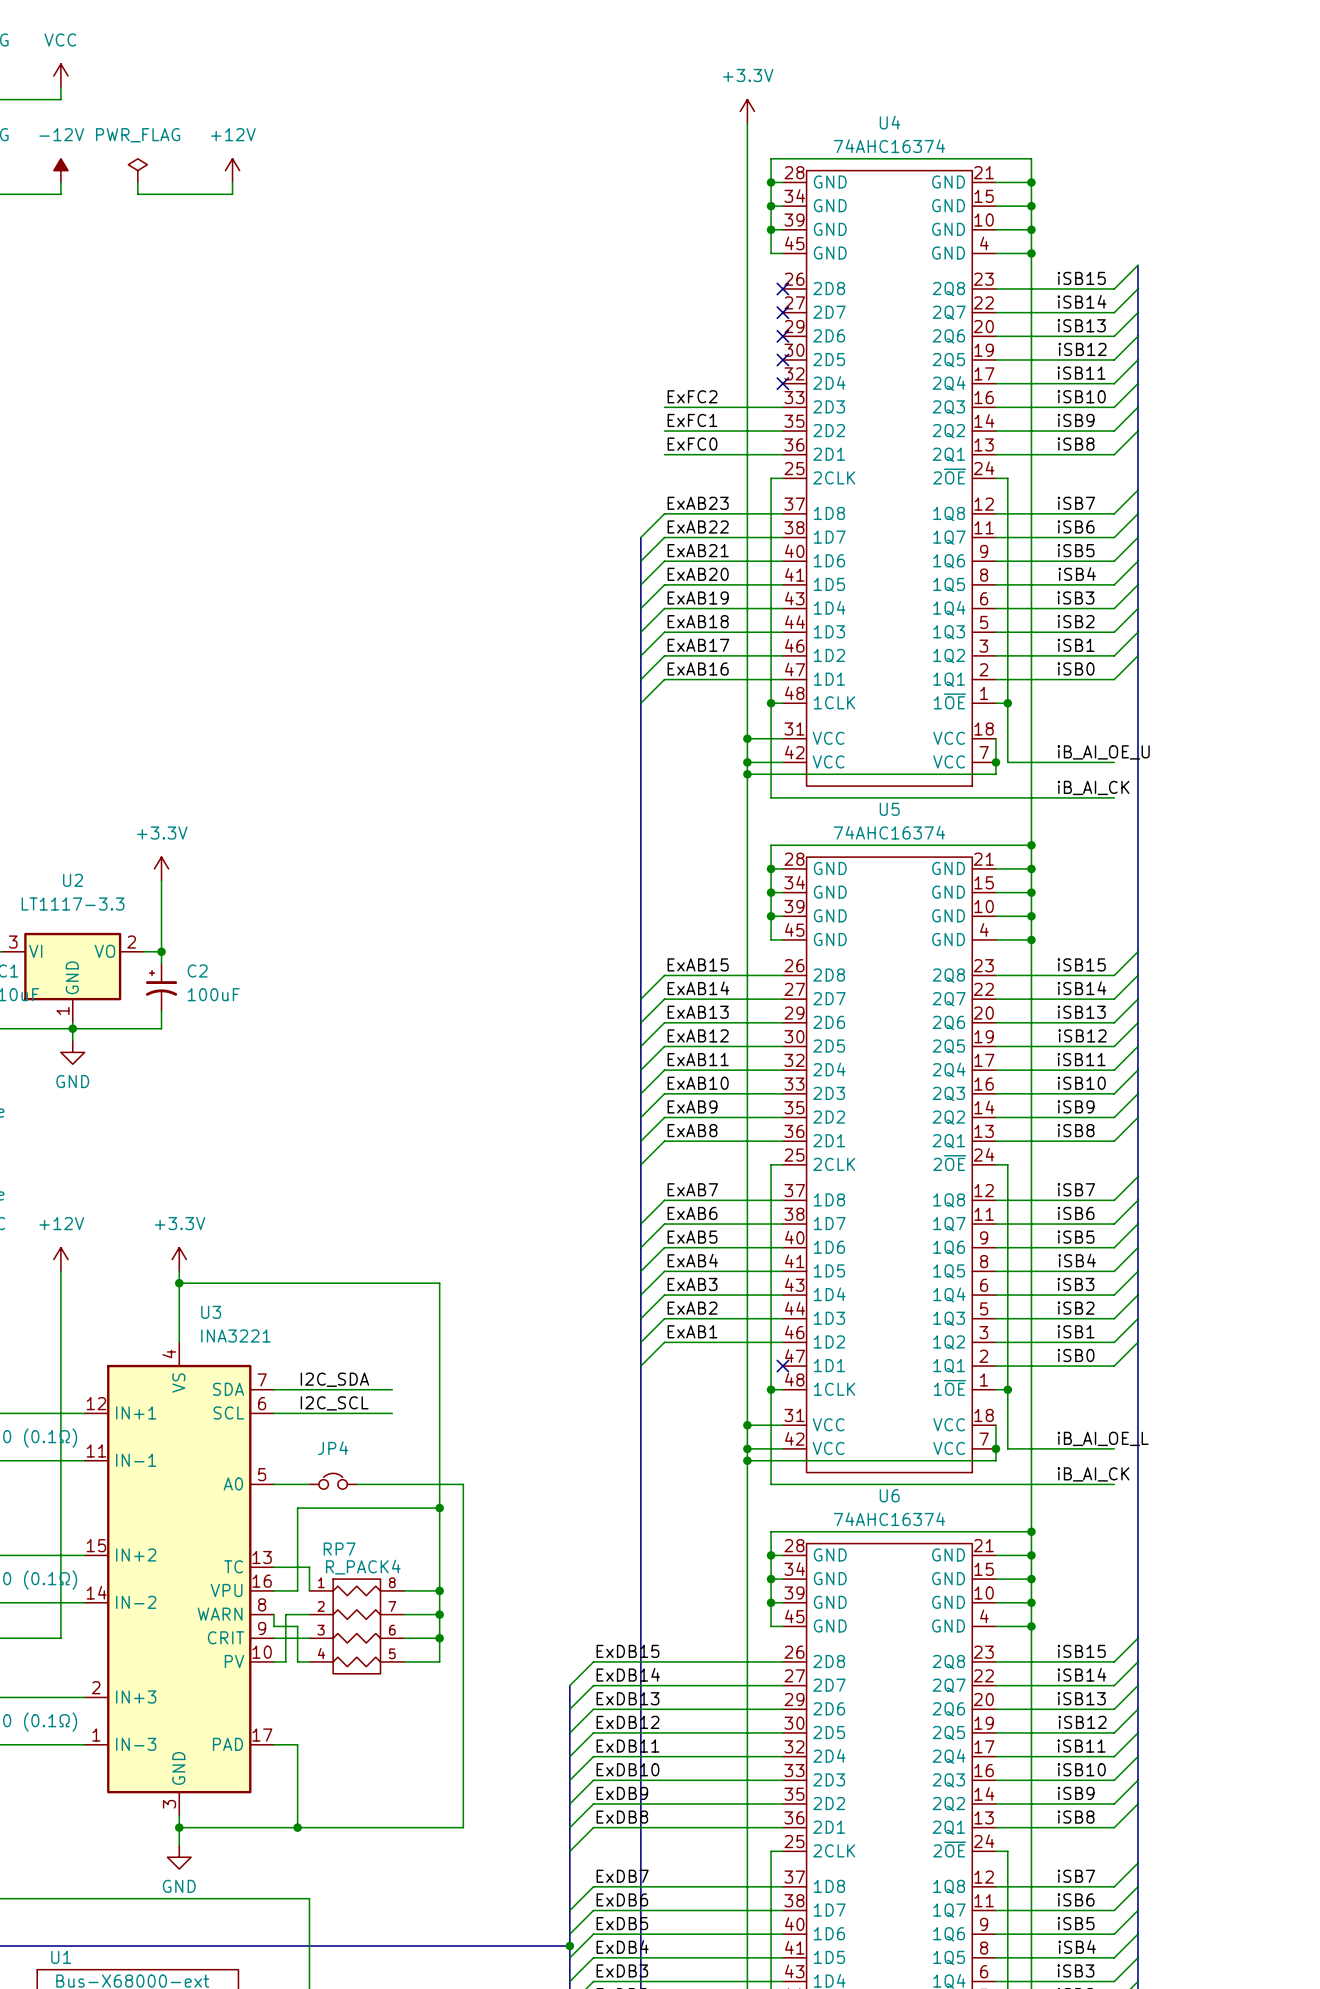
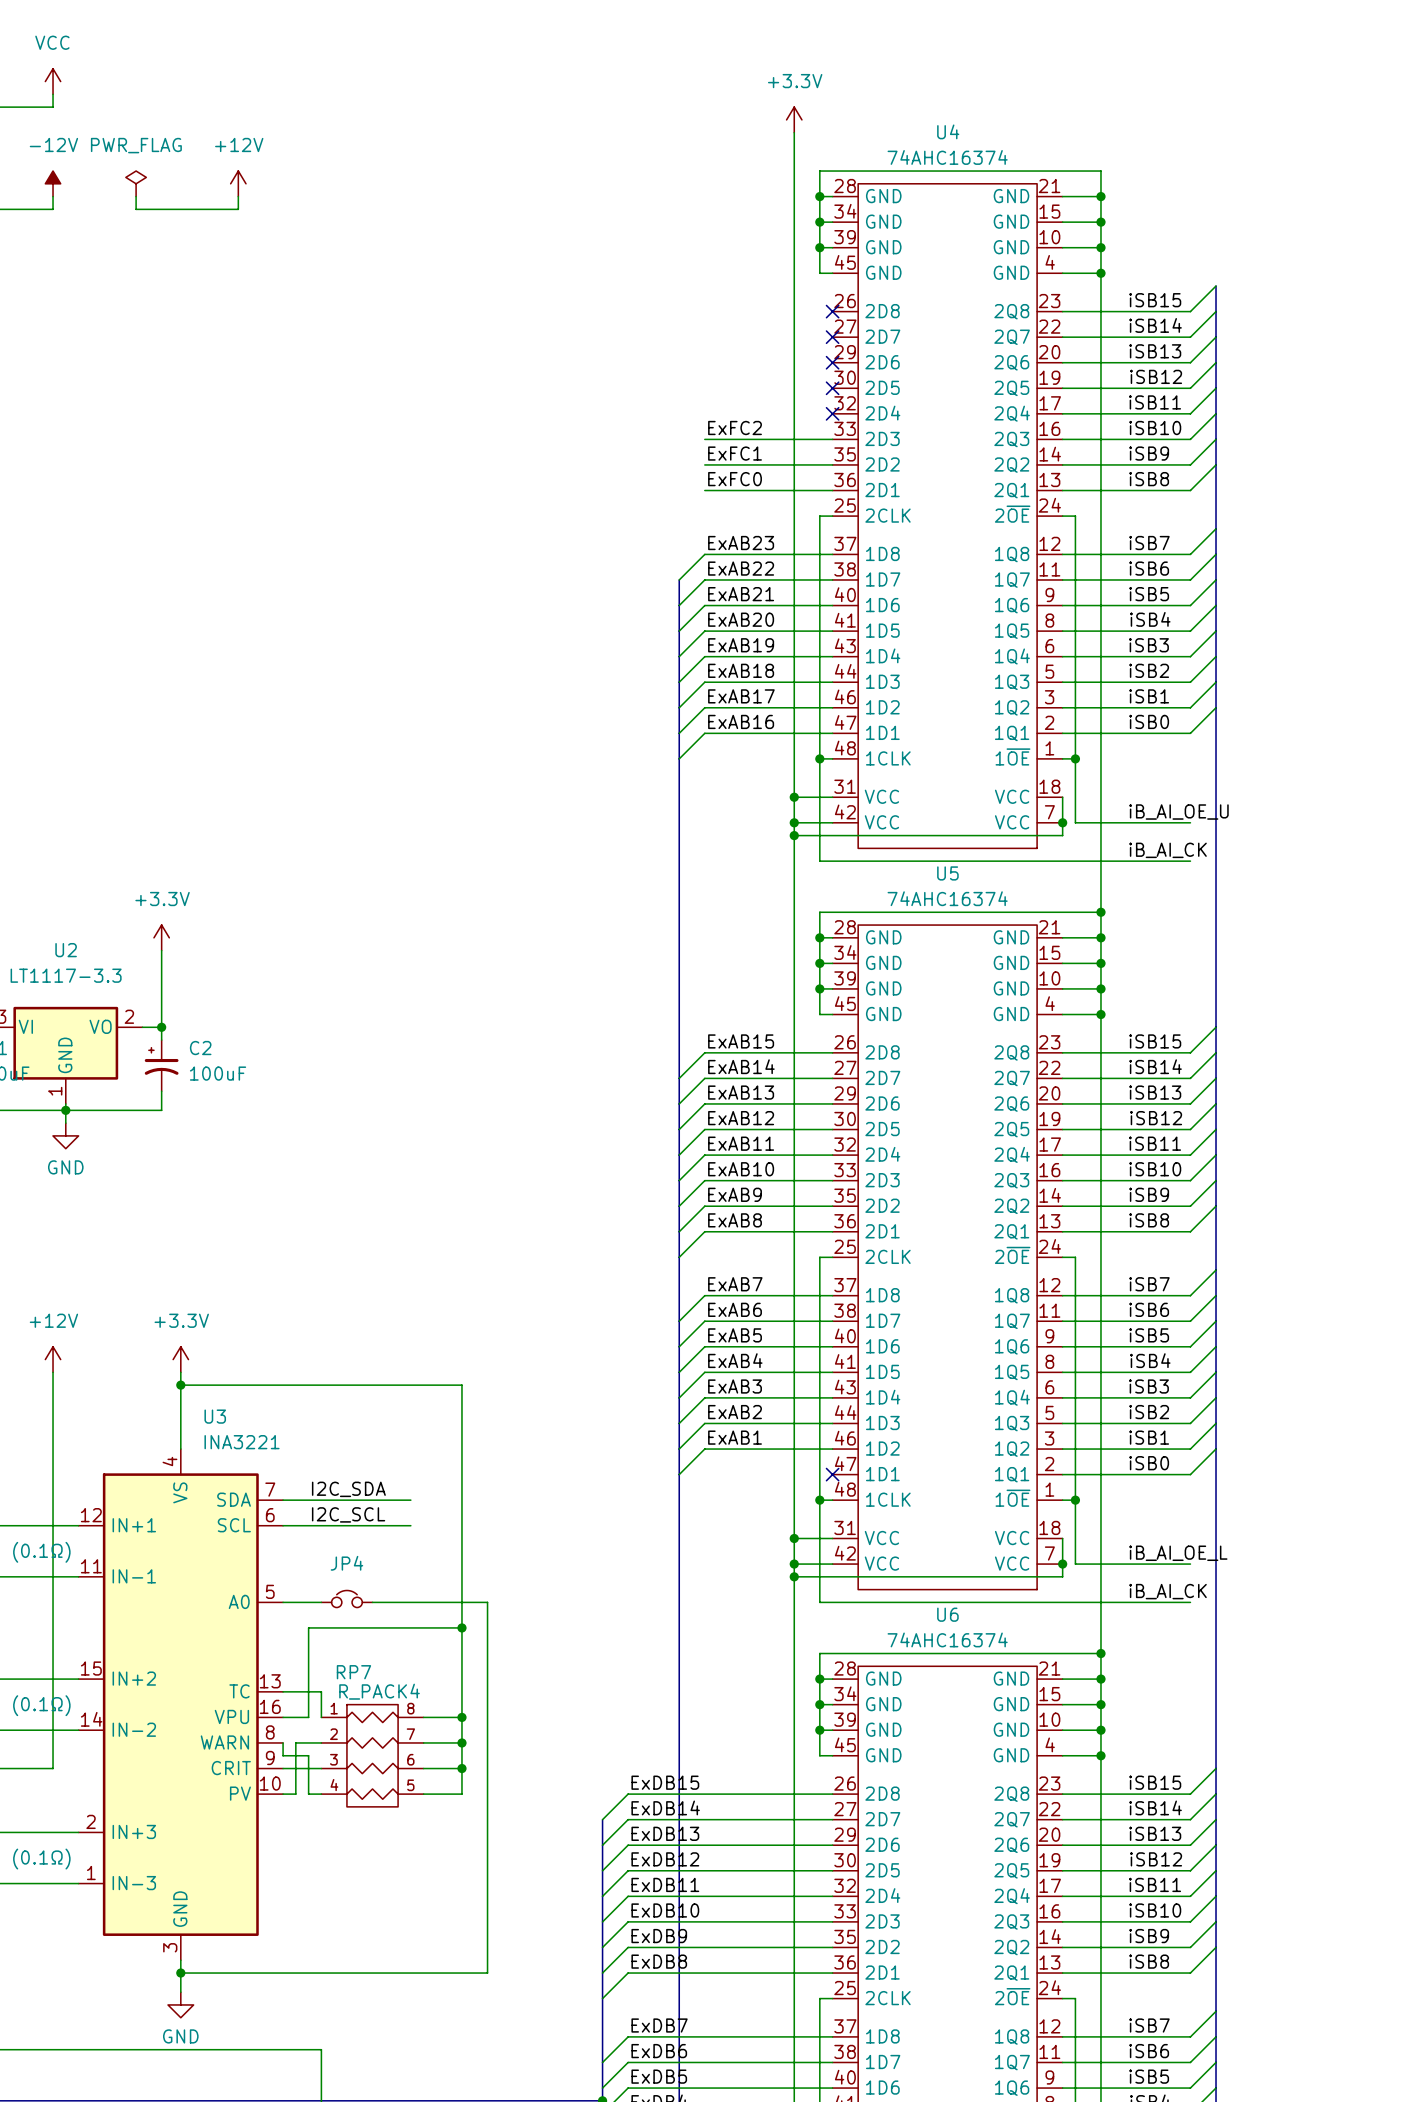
U3 symbol: [84, 1342, 274, 1816] -> [78, 1449, 284, 1961]
wire: (273, 1744) (297, 1744) (297, 1827) -> none
junction: (297, 1827) -> none

